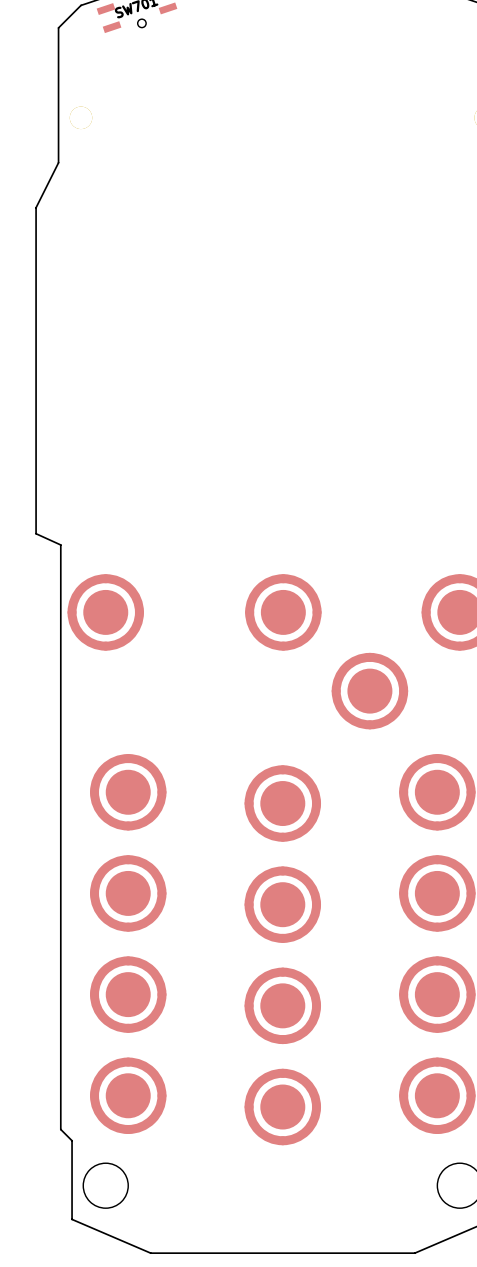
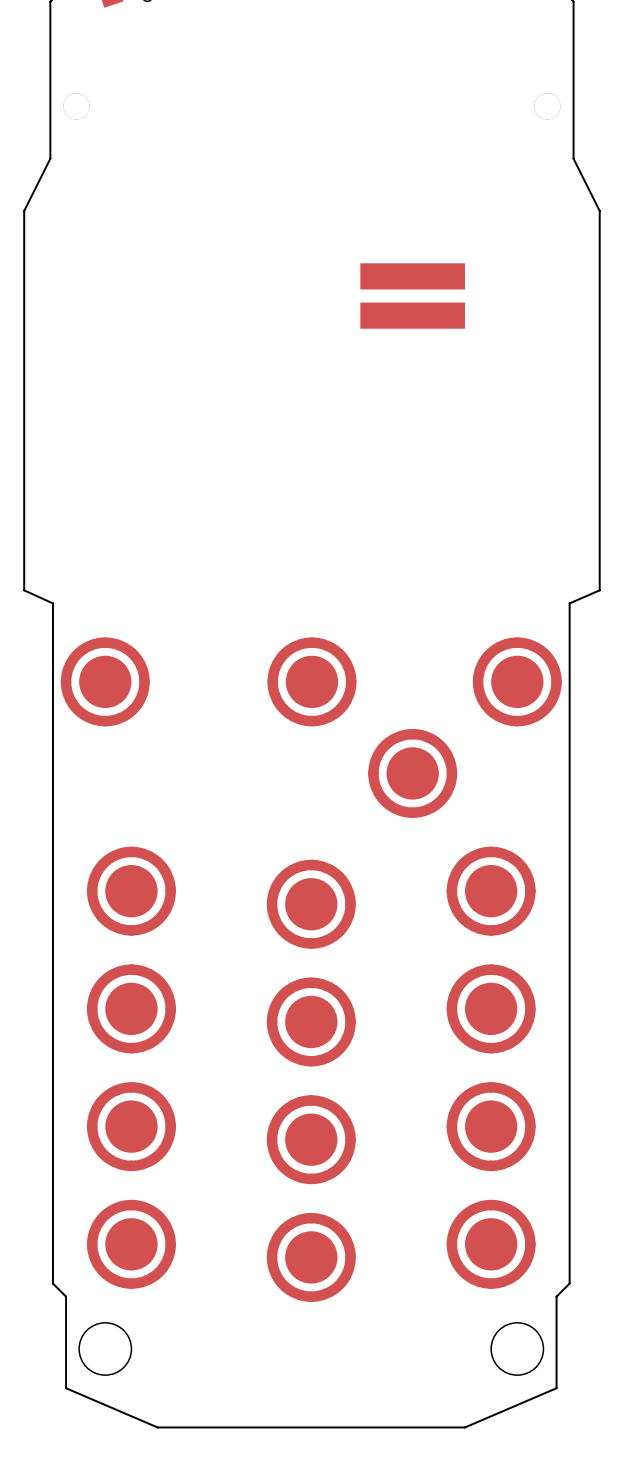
part: none -> (412, 296)

